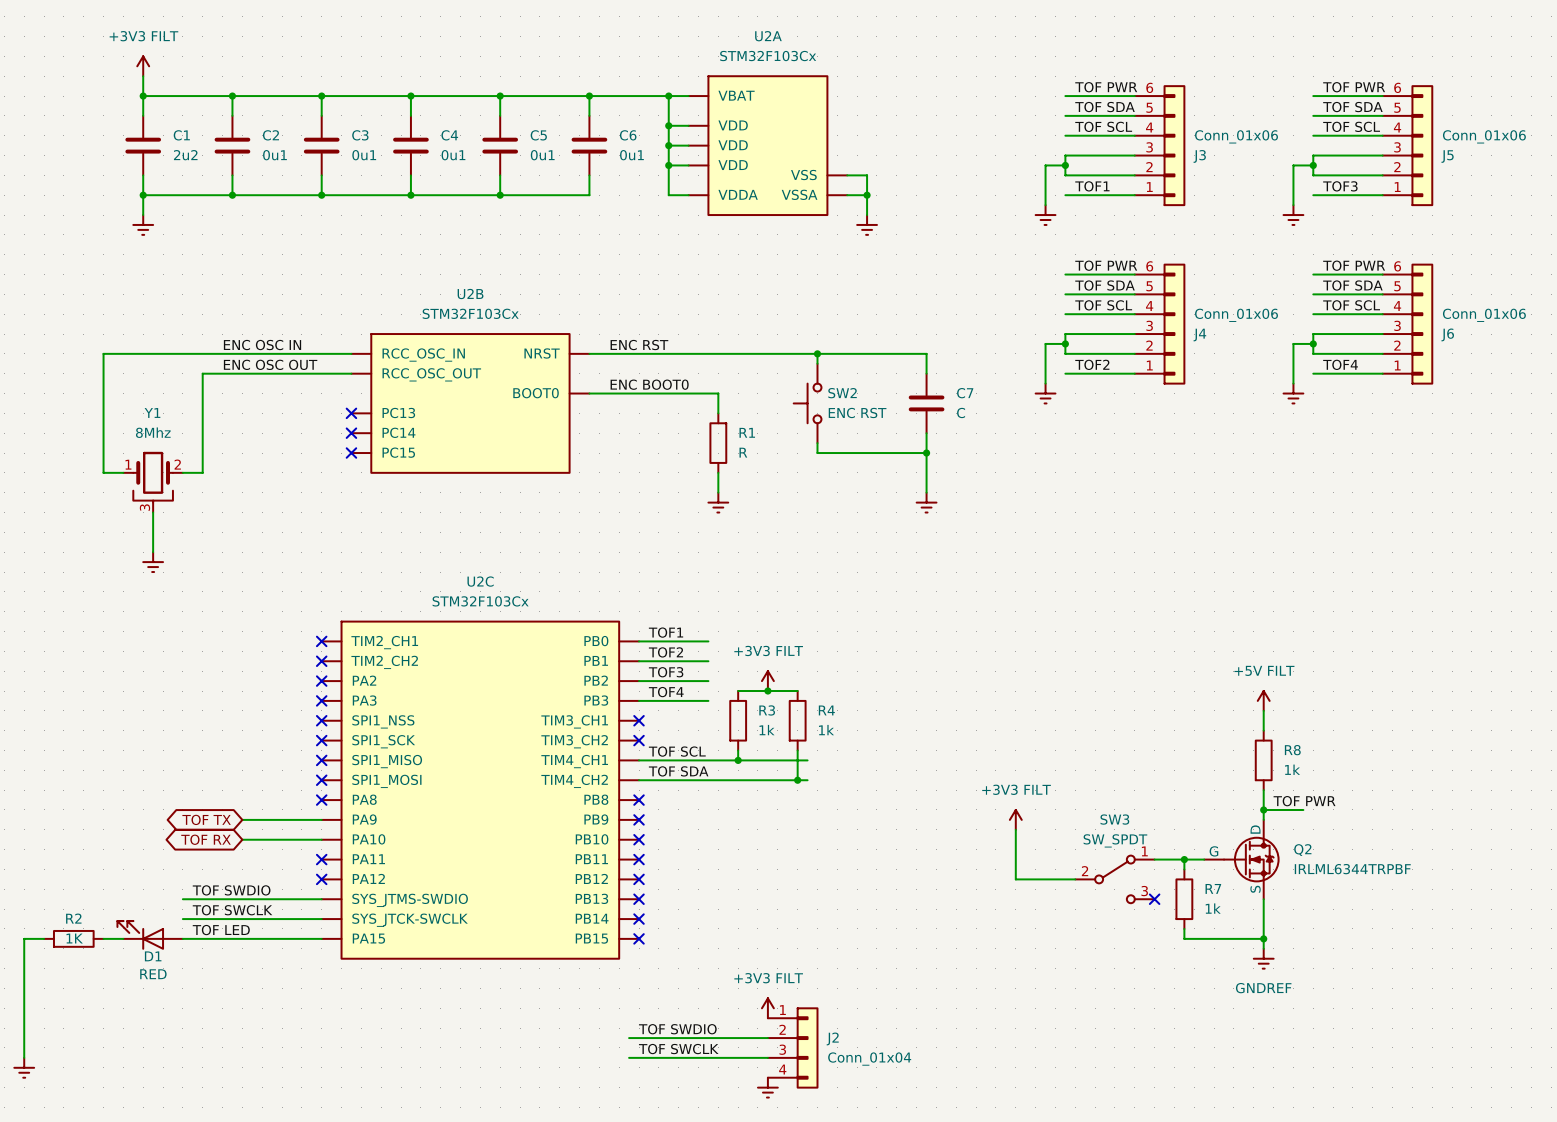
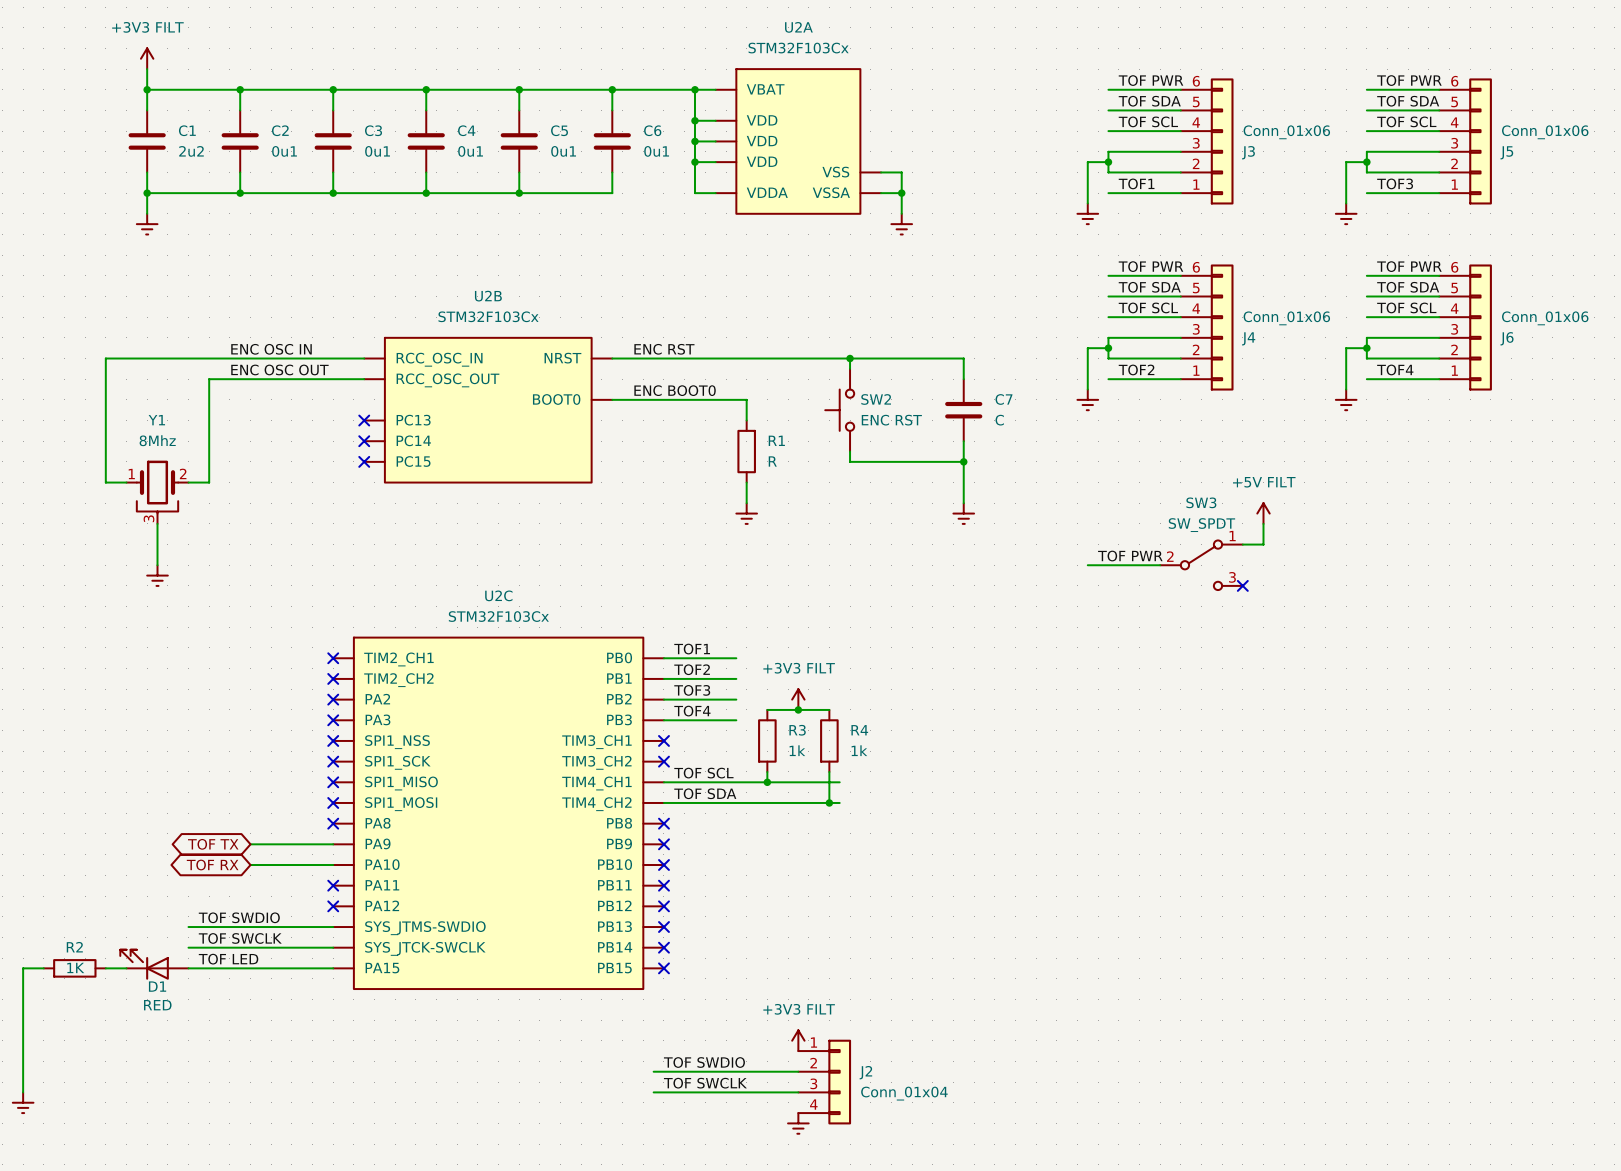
power symbol: none -> +5V FILT (1263, 513)
wire: none -> (1263, 523) (1263, 544) (1242, 544)
label: none -> TOF PWR (1130, 556)
wire: none -> (1087, 565) (1160, 565)
no-connect mark: none -> (1242, 585)
power symbol: +5V FILT (1263, 700) -> none
wire: (1263, 710) (1263, 730) -> none
R8: 1k (1263, 760) -> none
wire: (1263, 790) (1263, 819) -> none
label: TOF PWR (1304, 801) -> none
wire: (1263, 809) (1303, 809) -> none
junction: (1263, 809) -> none
power symbol: +3V3 FILT (1015, 819) -> none
wire: (1015, 829) (1015, 879) (1075, 879) -> none
wire: (1154, 859) (1204, 859) -> none
wire: (1184, 859) (1184, 869) -> none
junction: (1184, 859) -> none
Q2: IRLML6344TRPBF (1241, 859) -> none
SW3 position: (1114, 879) -> (1201, 565)
no-connect mark: (1154, 899) -> none
R7: 1k (1184, 899) -> none
wire: (1263, 899) (1263, 948) -> none
wire: (1184, 928) (1184, 938) (1263, 938) -> none
junction: (1263, 938) -> none
power symbol: GNDREF (1263, 958) -> none

